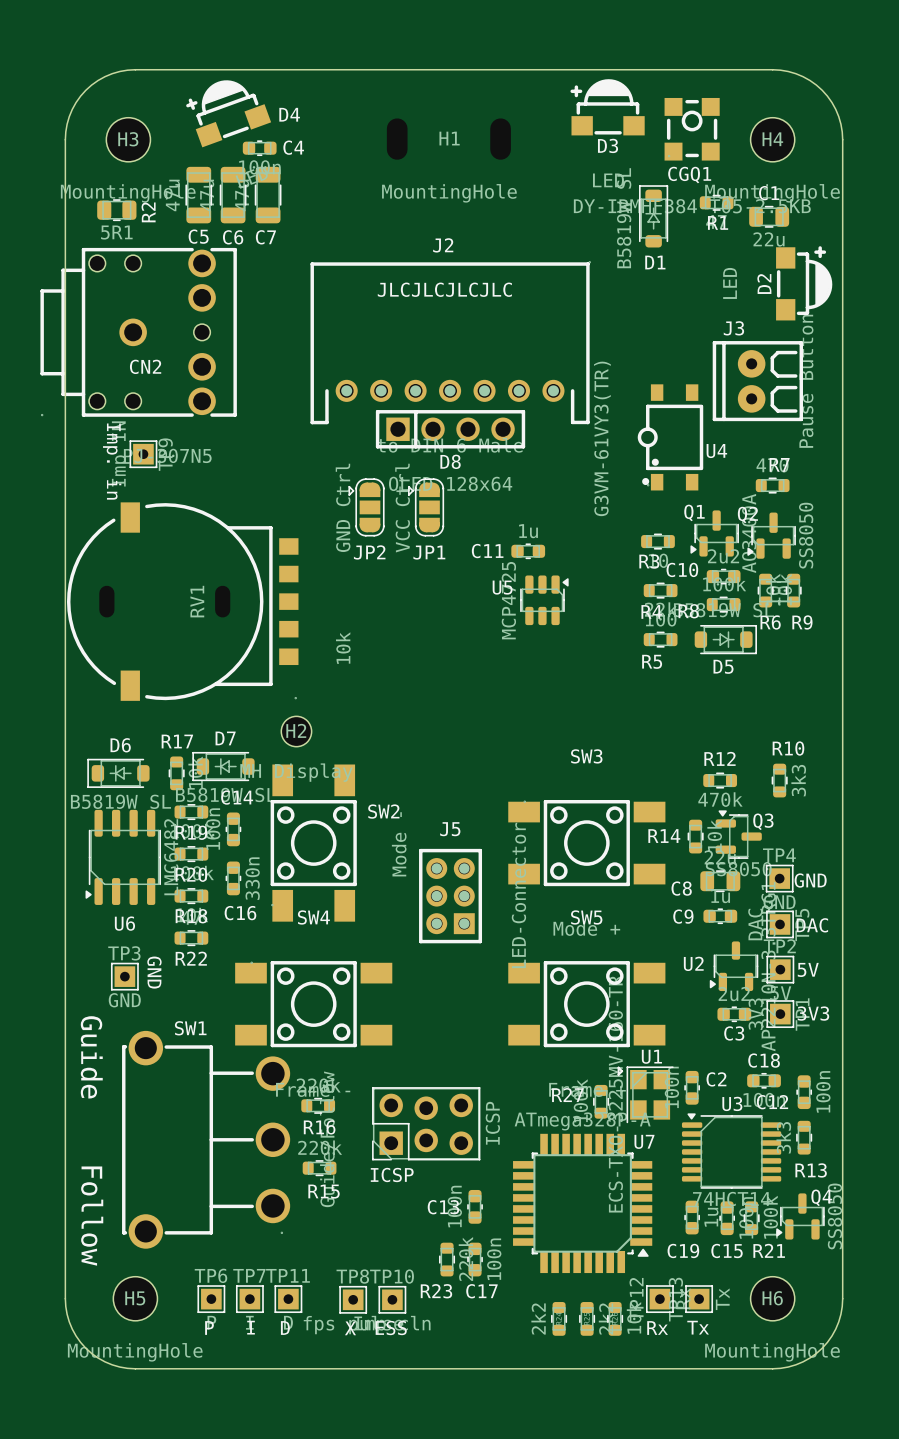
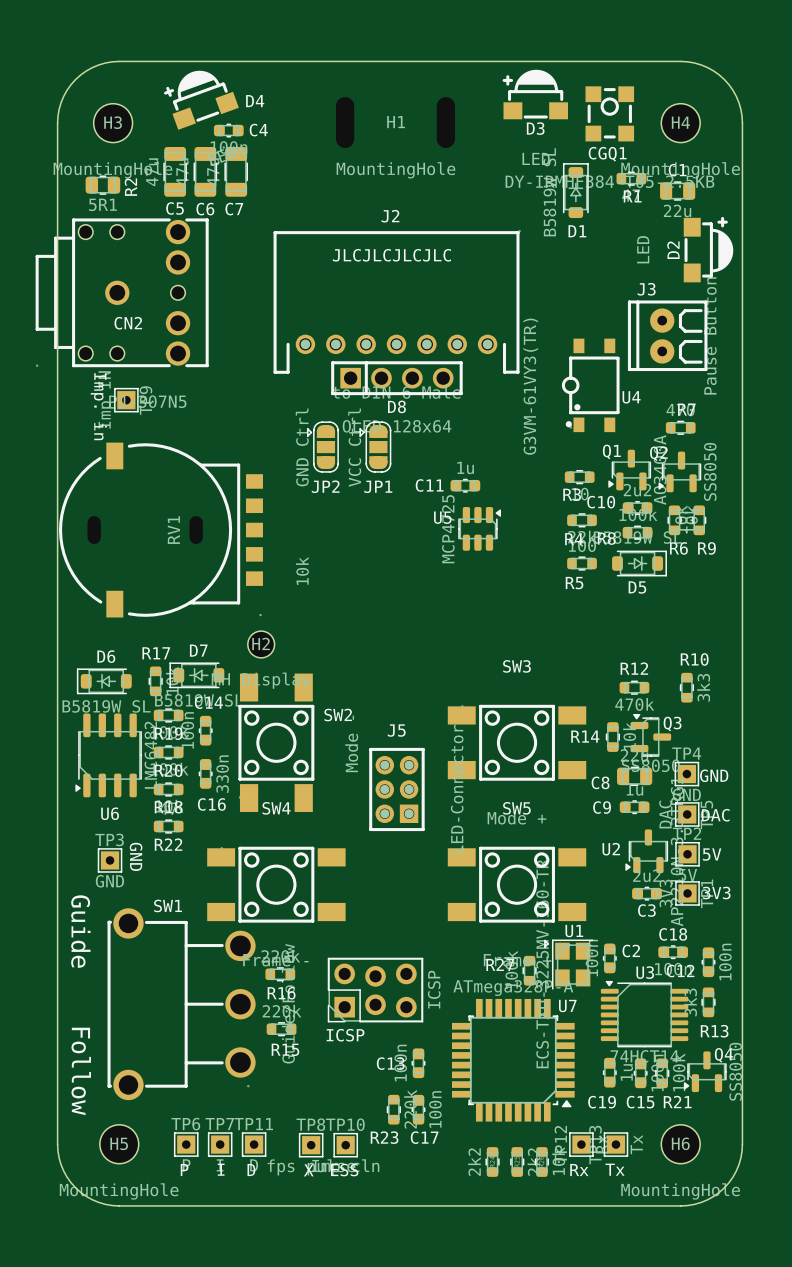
H1 footprint: [386, 118, 511, 160] -> [335, 97, 456, 149]

